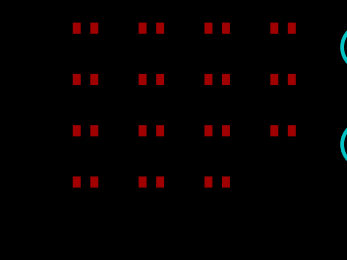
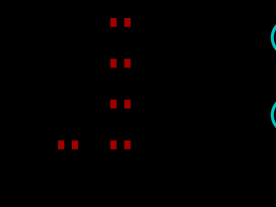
part: (85, 28) -> none
part: (217, 28) -> none
part: (283, 28) -> none
part: (85, 79) -> none
part: (217, 79) -> none
part: (283, 79) -> none
part: (85, 130) -> none
part: (217, 130) -> none
part: (283, 130) -> none
part: (217, 182) -> none

